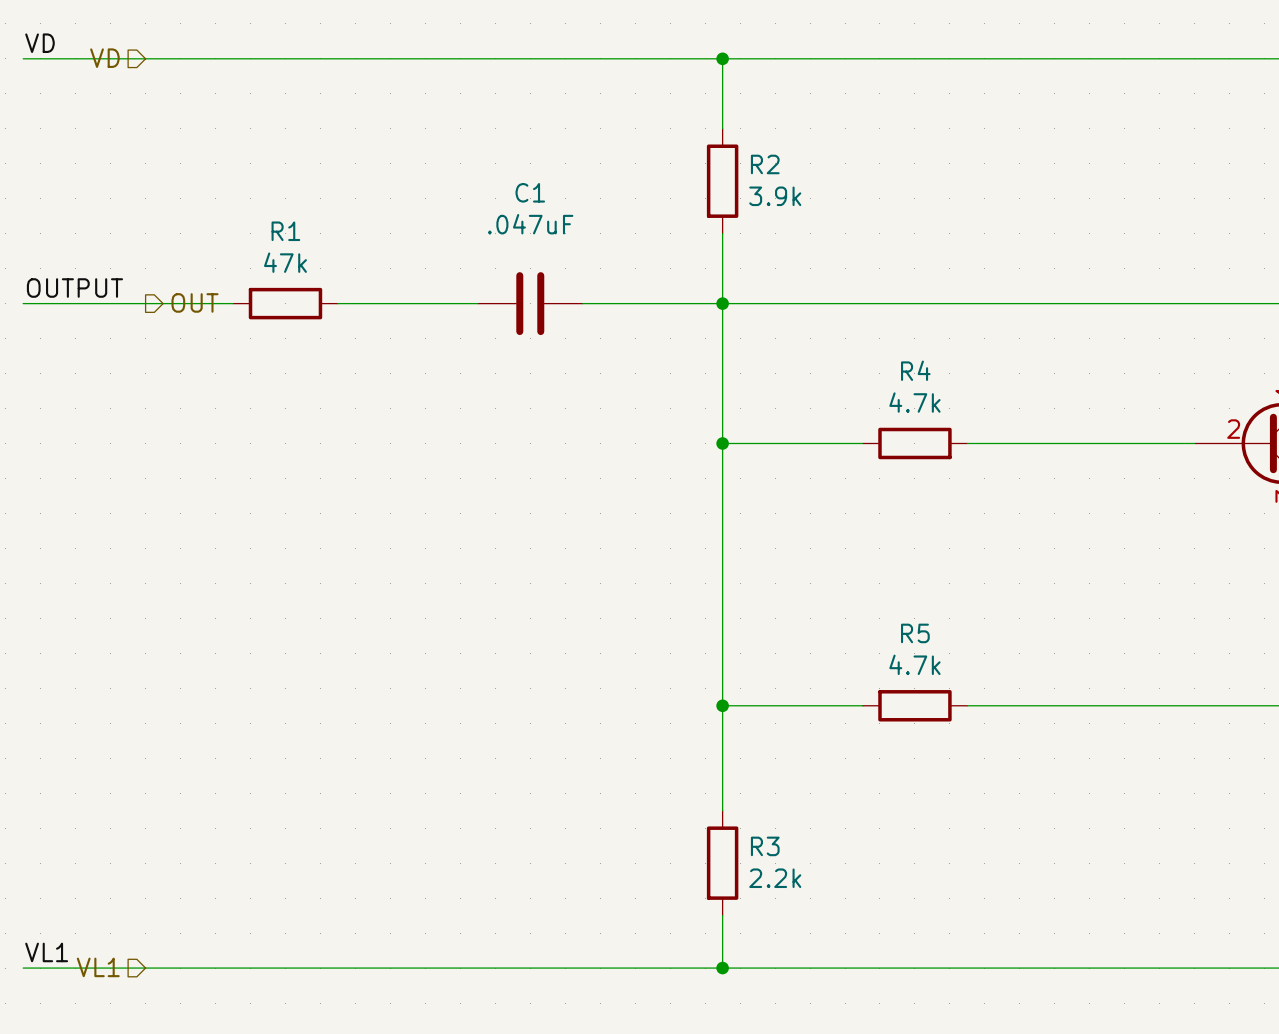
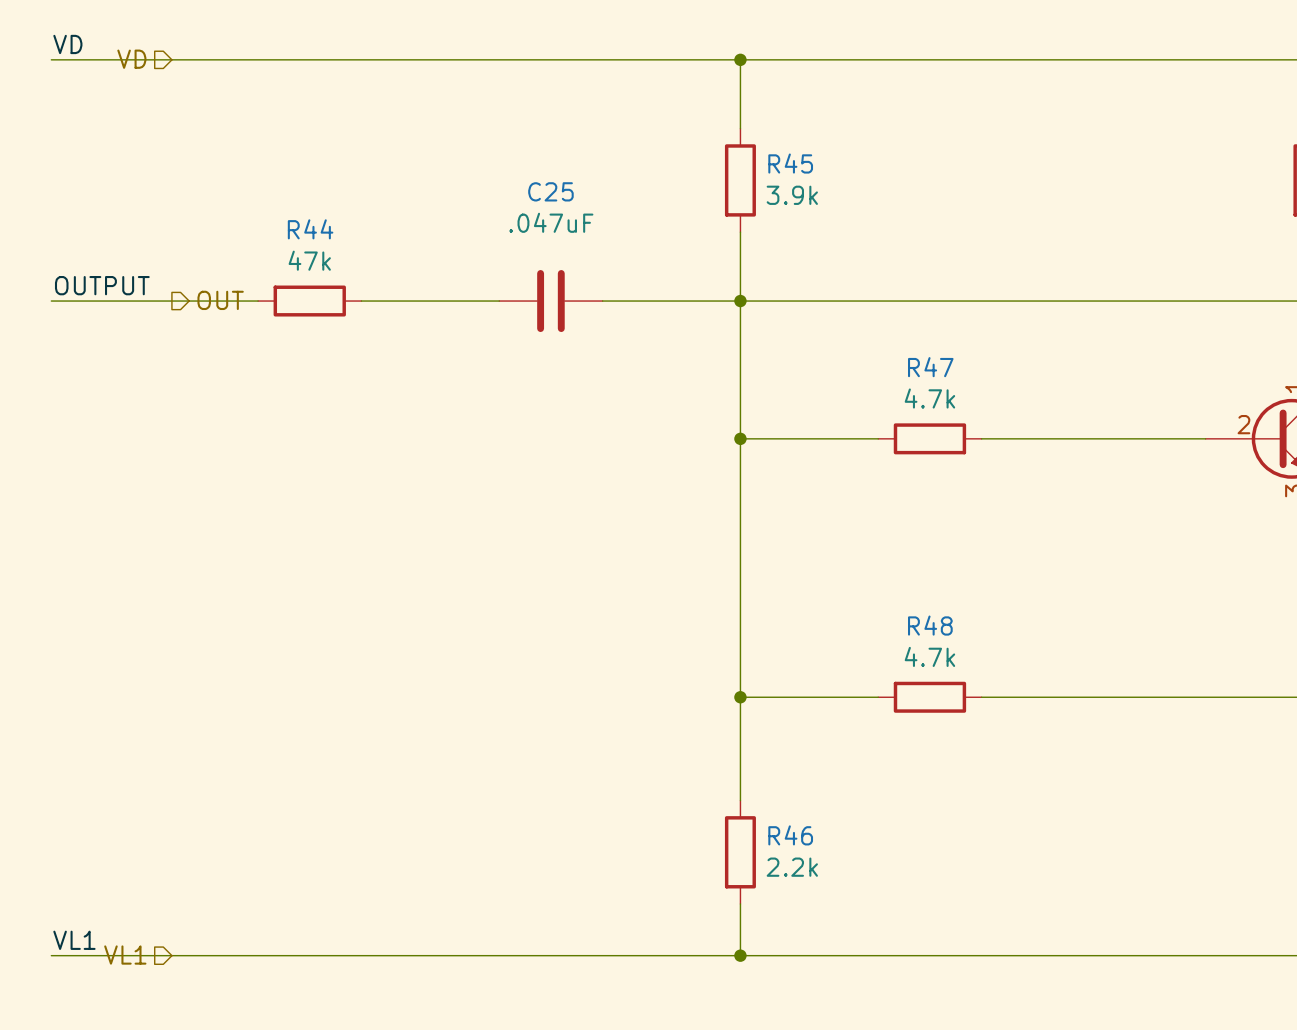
R2 name: R2 (765, 164) -> R45 (790, 163)
C1 name: C1 (530, 192) -> C25 (550, 191)
R1 name: R1 (285, 231) -> R44 (310, 229)
R4 name: R4 (915, 370) -> R47 (930, 367)
R5 name: R5 (915, 633) -> R48 (930, 625)
R3 name: R3 (765, 846) -> R46 (790, 835)

